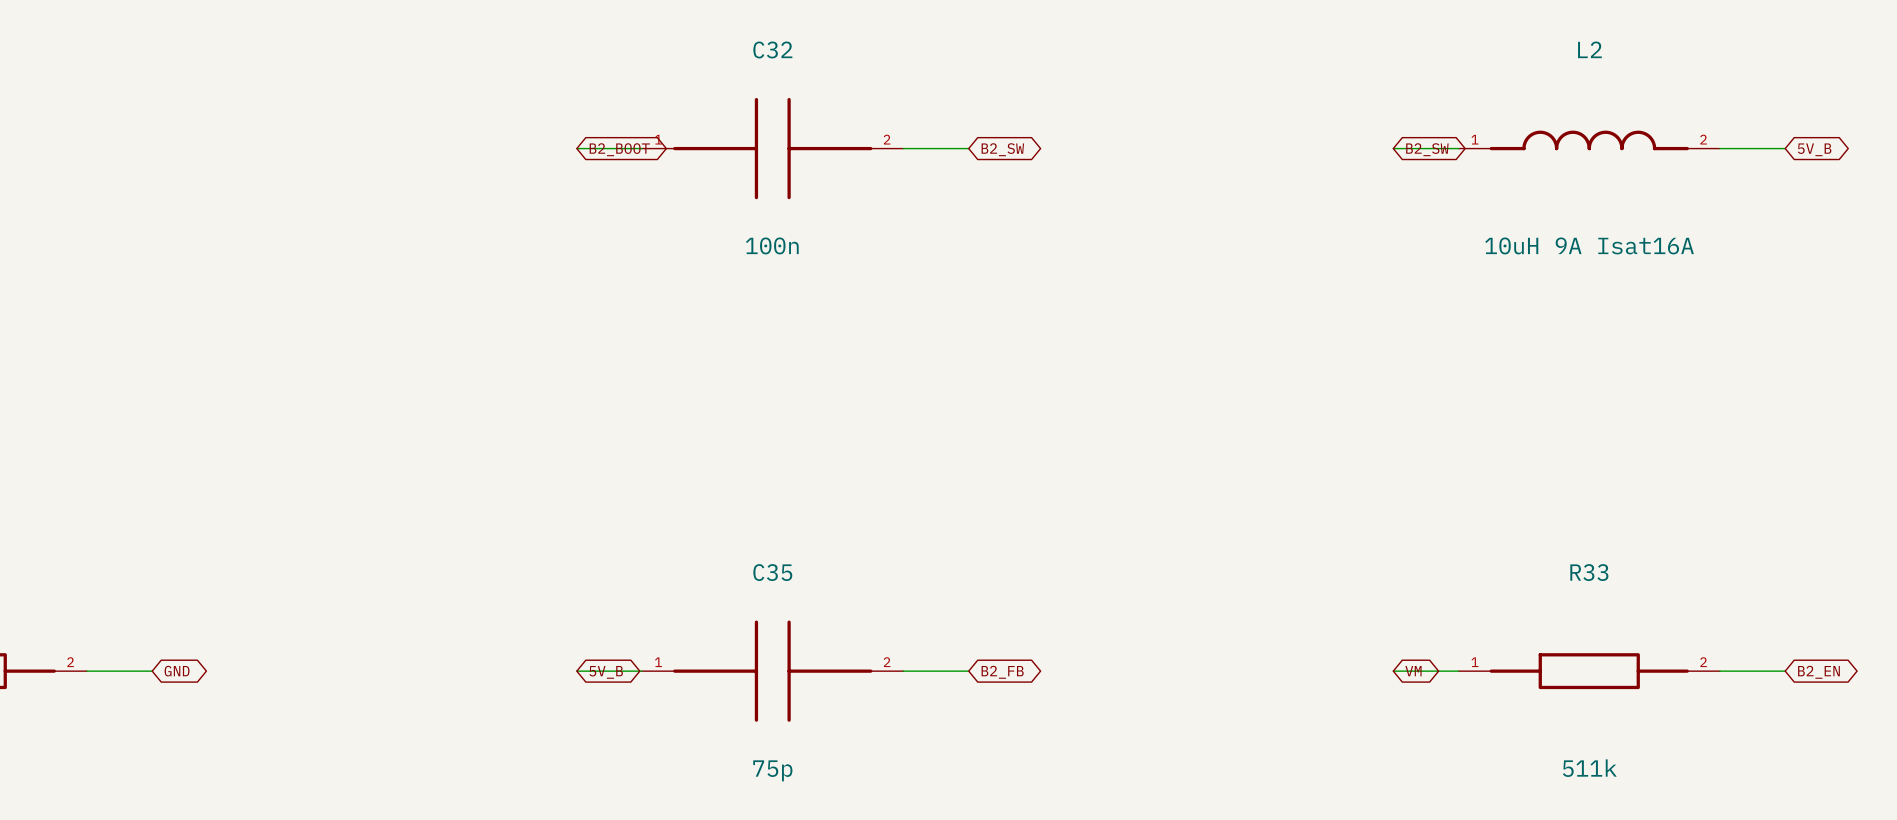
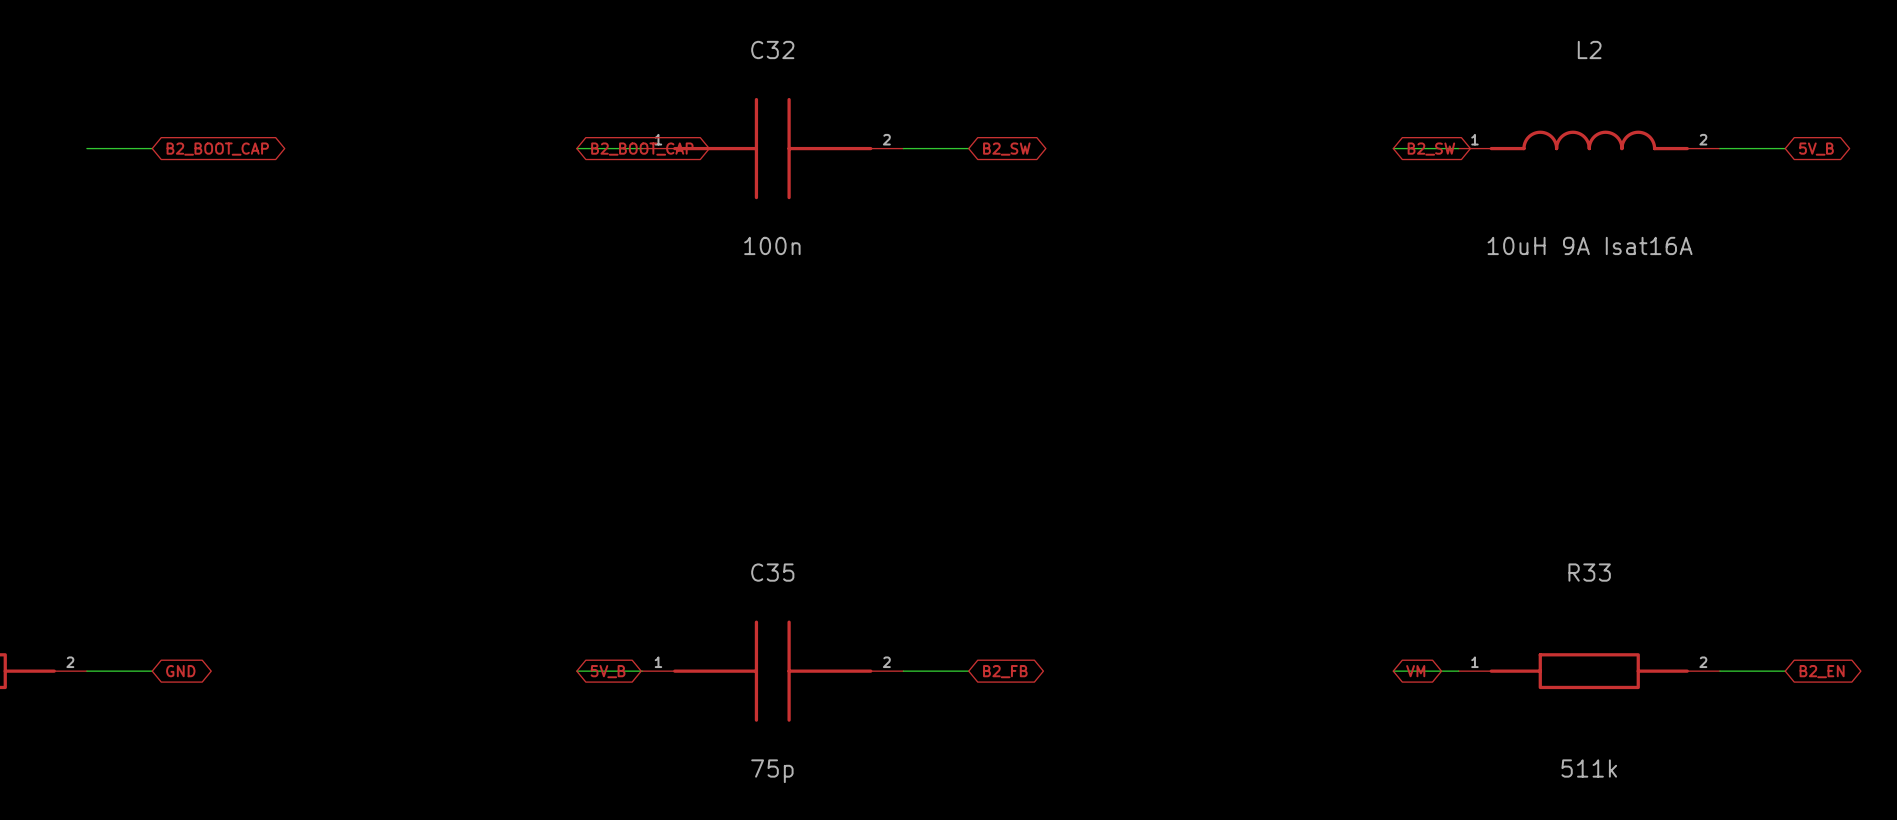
wire: none -> (86, 148) (152, 148)
global label: none -> B2_BOOT_CAP (217, 149)
global label: B2_BOOT (619, 149) -> B2_BOOT_CAP (642, 149)

